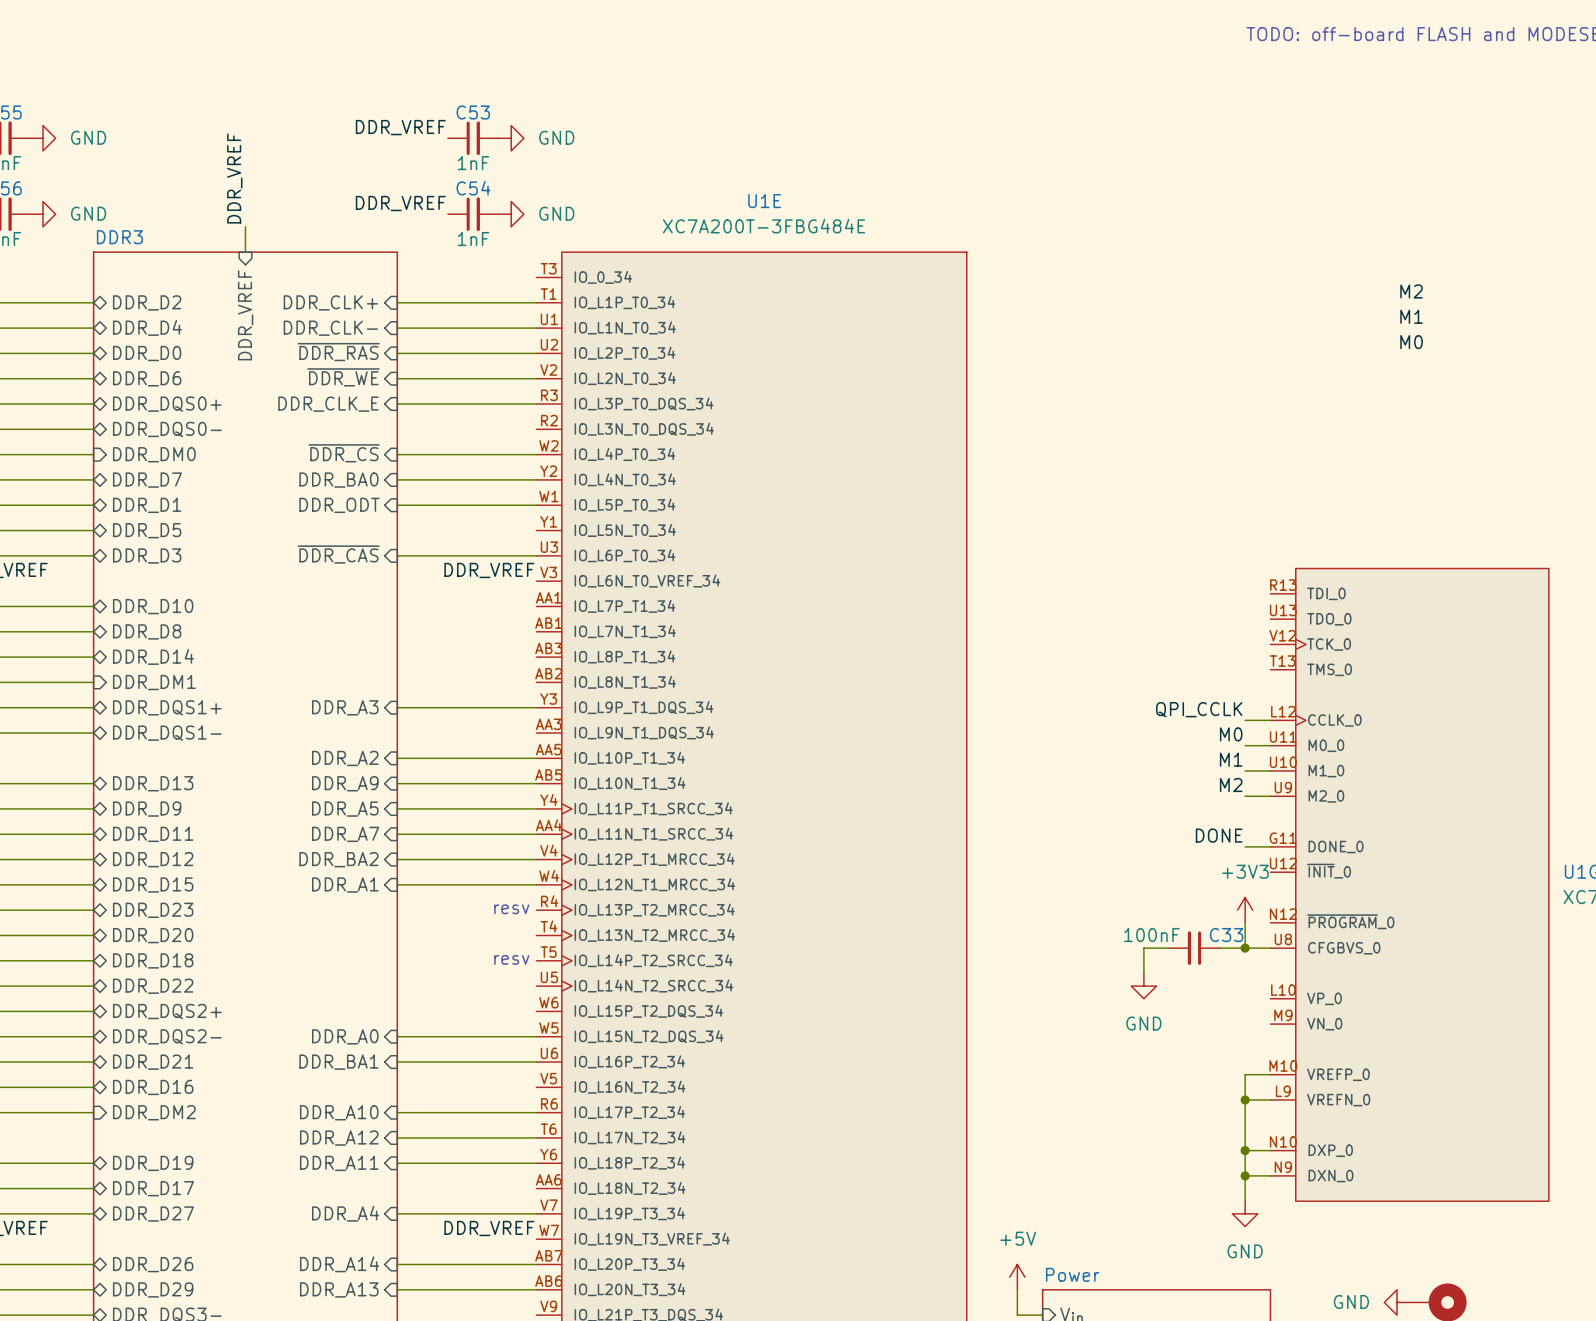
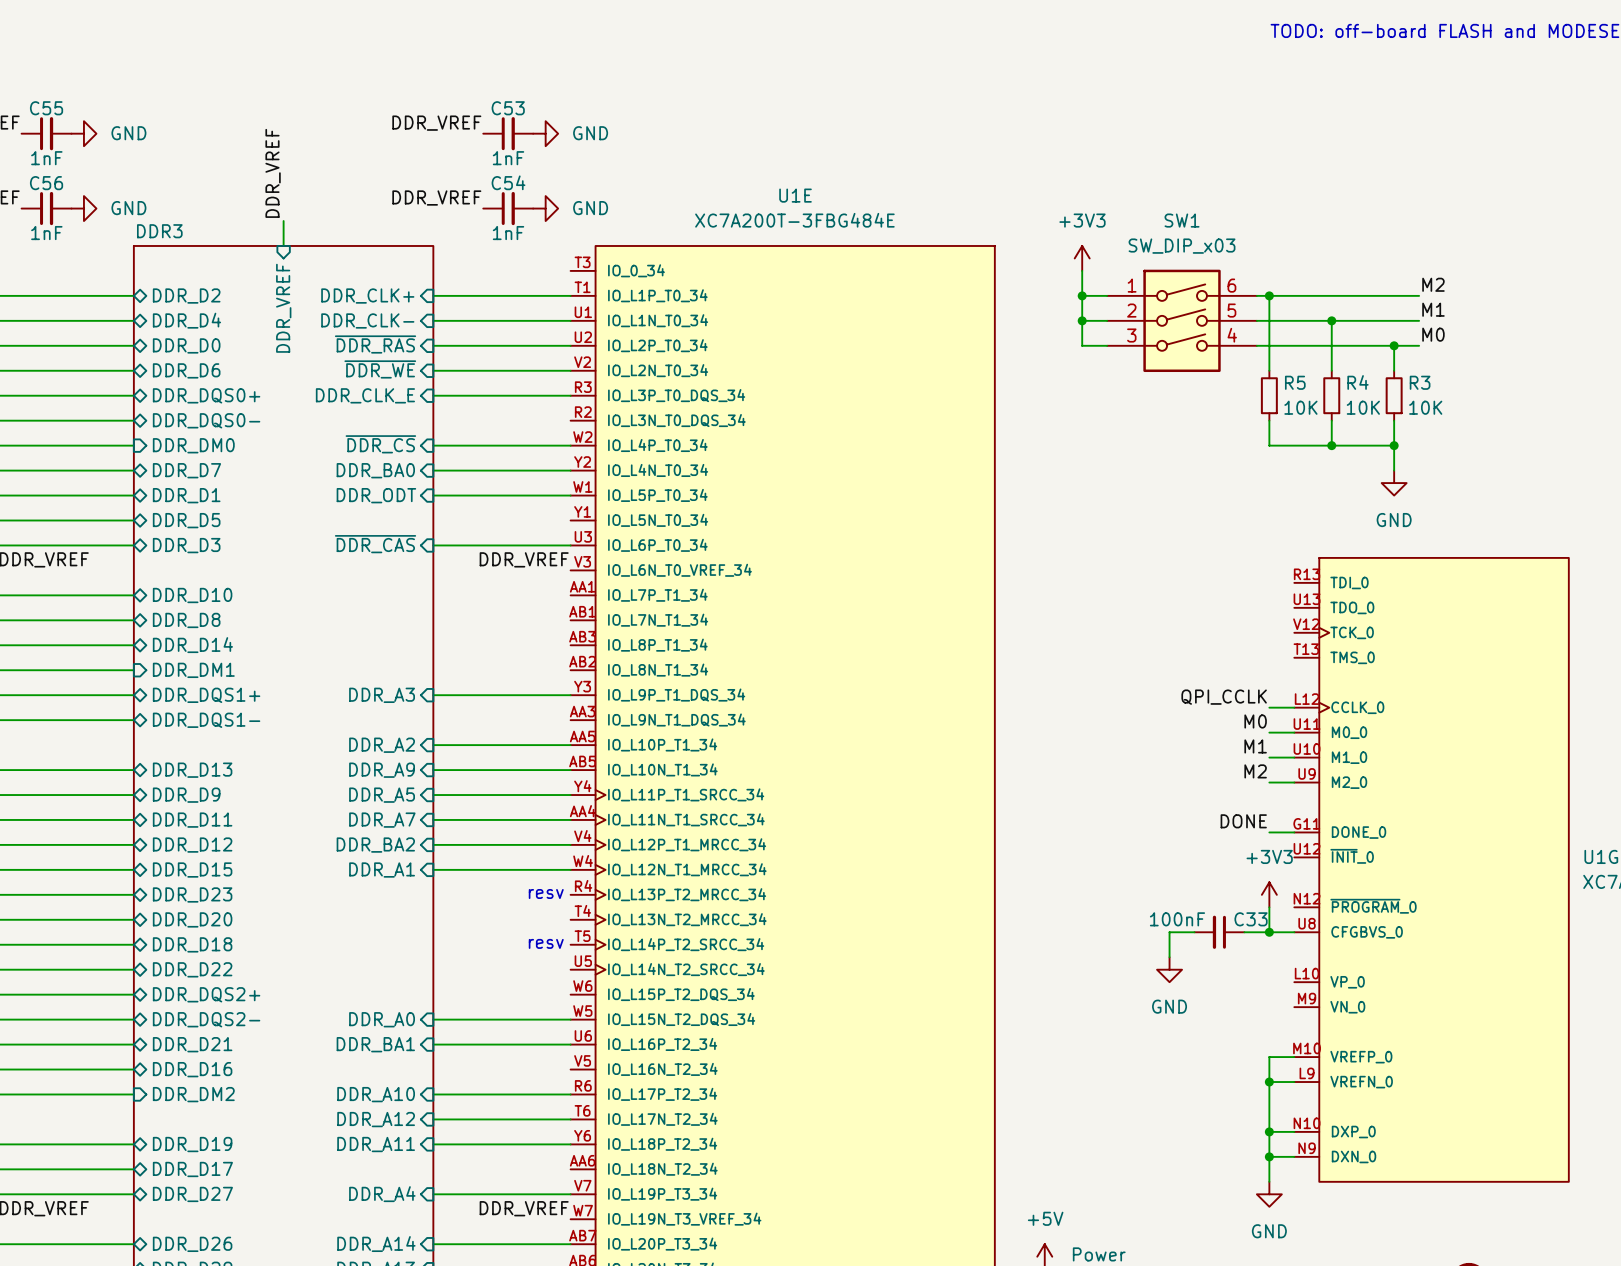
power symbol: none -> +3V3 (1082, 258)
wire: none -> (1082, 270) (1082, 345) (1107, 345)
wire: none -> (1082, 295) (1107, 295)
junction: none -> (1082, 295)
wire: none -> (1256, 295) (1419, 295)
wire: none -> (1269, 295) (1269, 370)
junction: none -> (1269, 295)
wire: none -> (1082, 320) (1107, 320)
junction: none -> (1082, 320)
SW1: none -> SW_DIP_x03 (1182, 320)
wire: none -> (1256, 320) (1419, 320)
wire: none -> (1331, 320) (1331, 370)
junction: none -> (1331, 320)
wire: none -> (1256, 345) (1419, 345)
wire: none -> (1394, 345) (1394, 370)
junction: none -> (1394, 345)
R5: none -> 10K (1269, 395)
R4: none -> 10K (1331, 395)
R3: none -> 10K (1394, 395)
wire: none -> (1269, 420) (1269, 445) (1394, 445)
wire: none -> (1331, 420) (1331, 445)
wire: none -> (1394, 420) (1394, 470)
junction: none -> (1331, 445)
junction: none -> (1394, 445)
power symbol: none -> GND (1394, 483)

